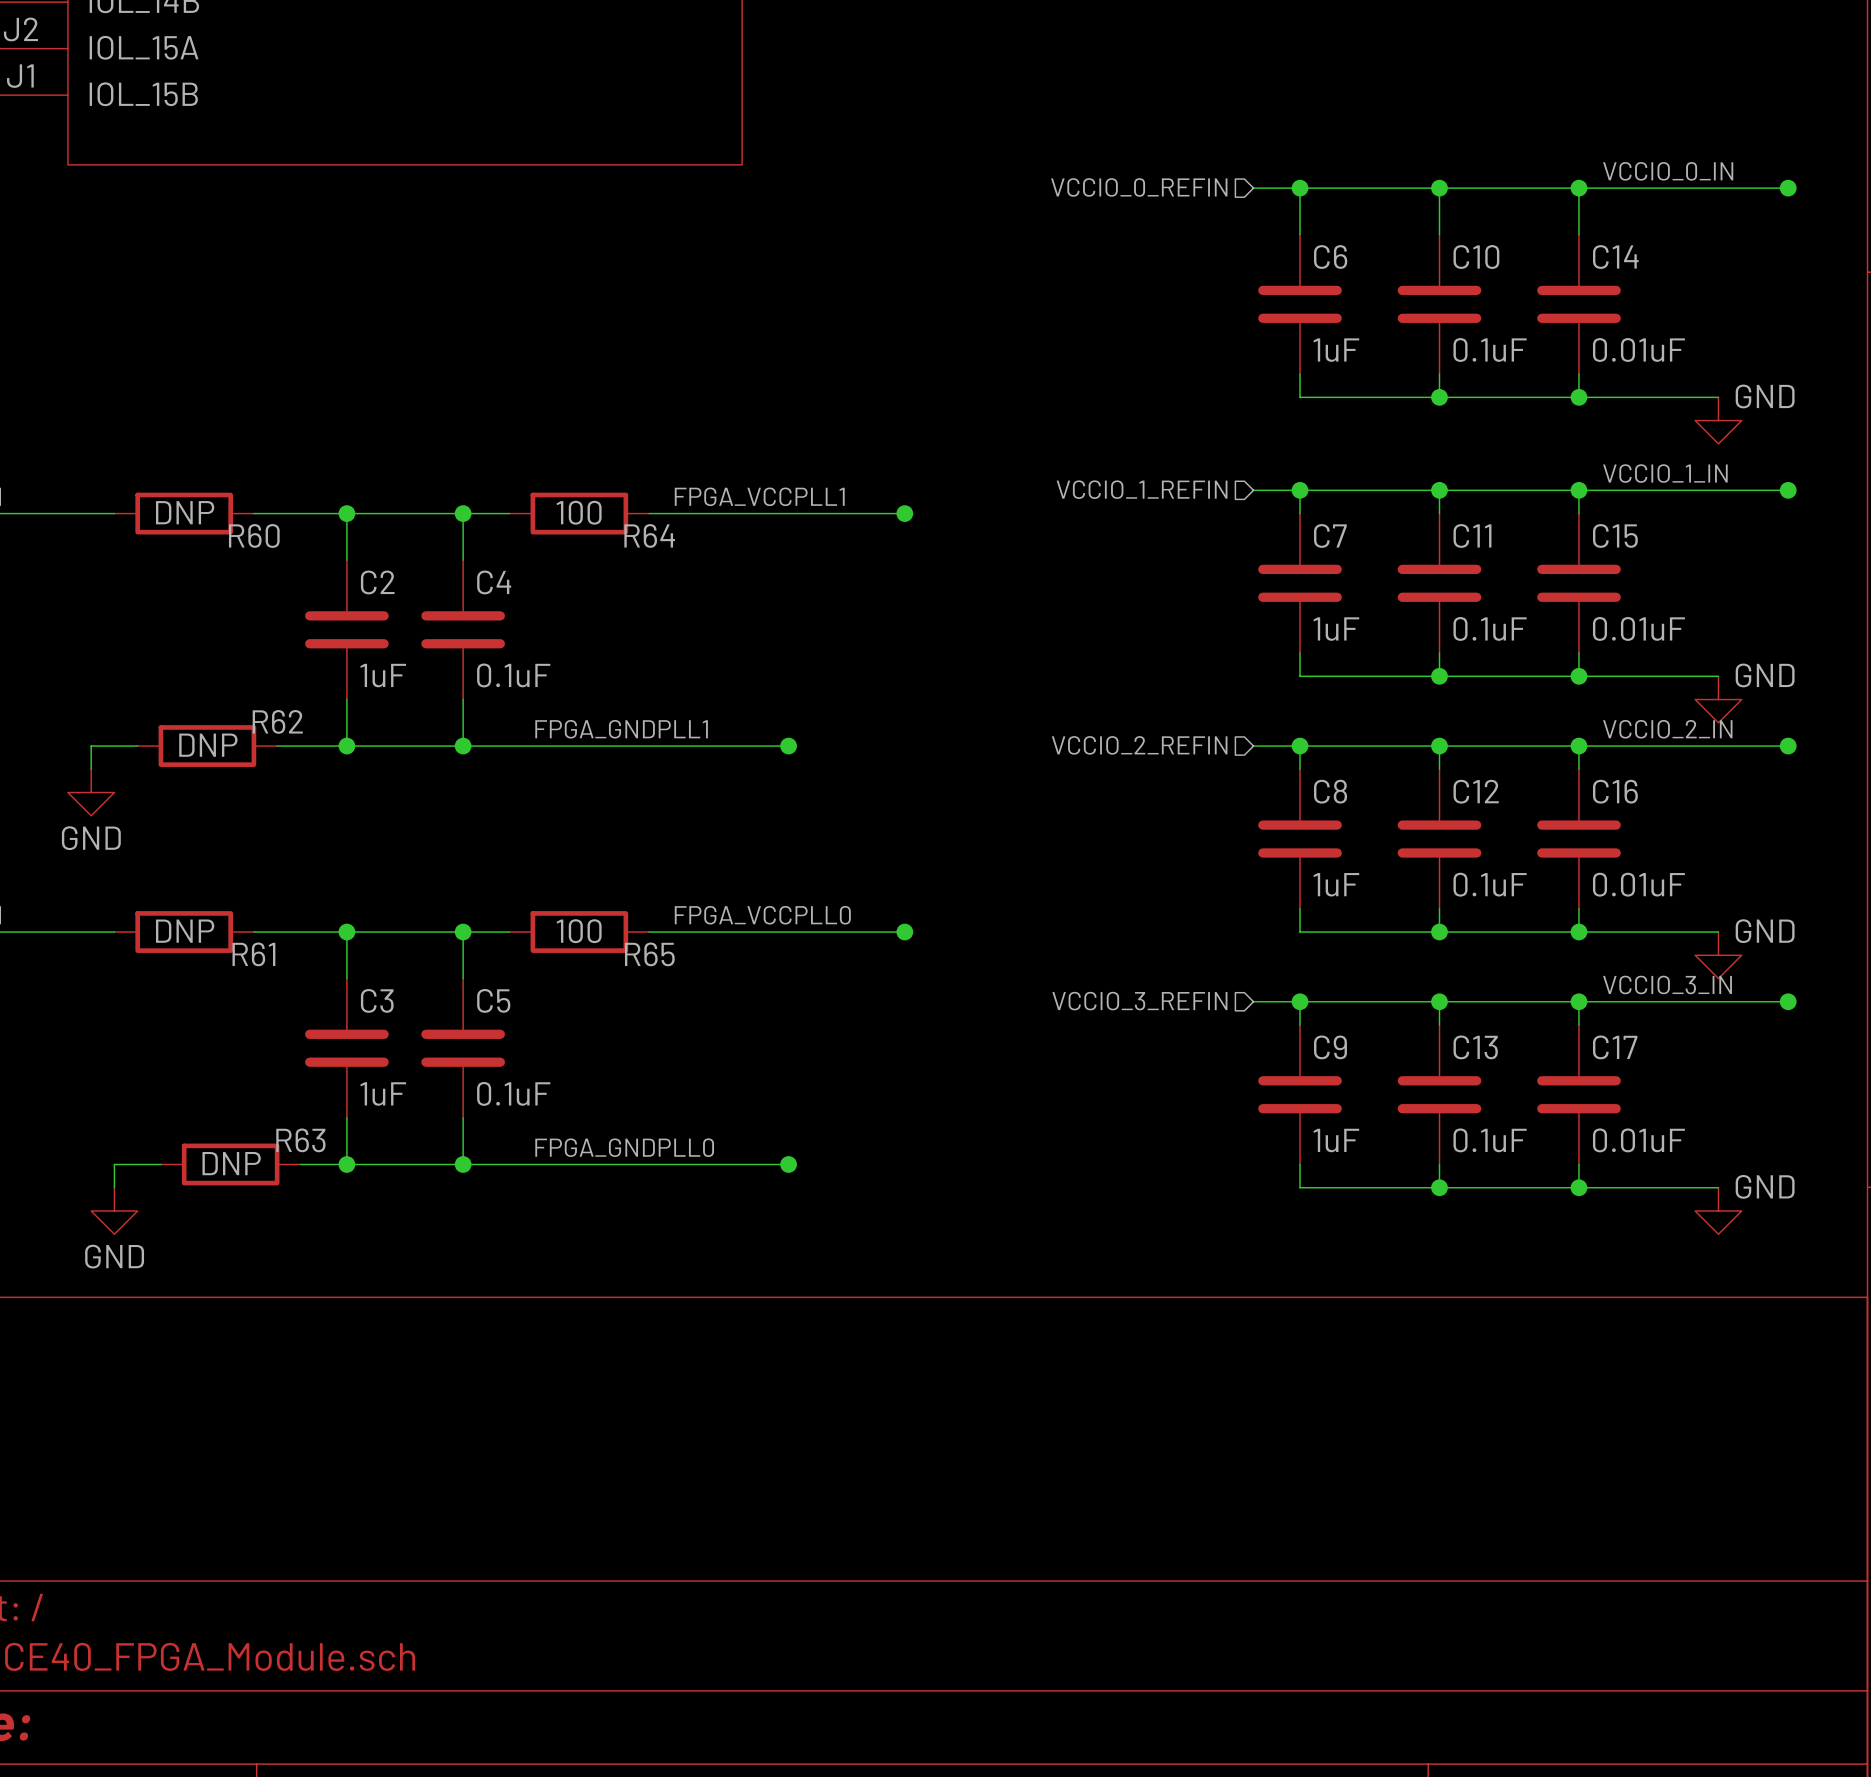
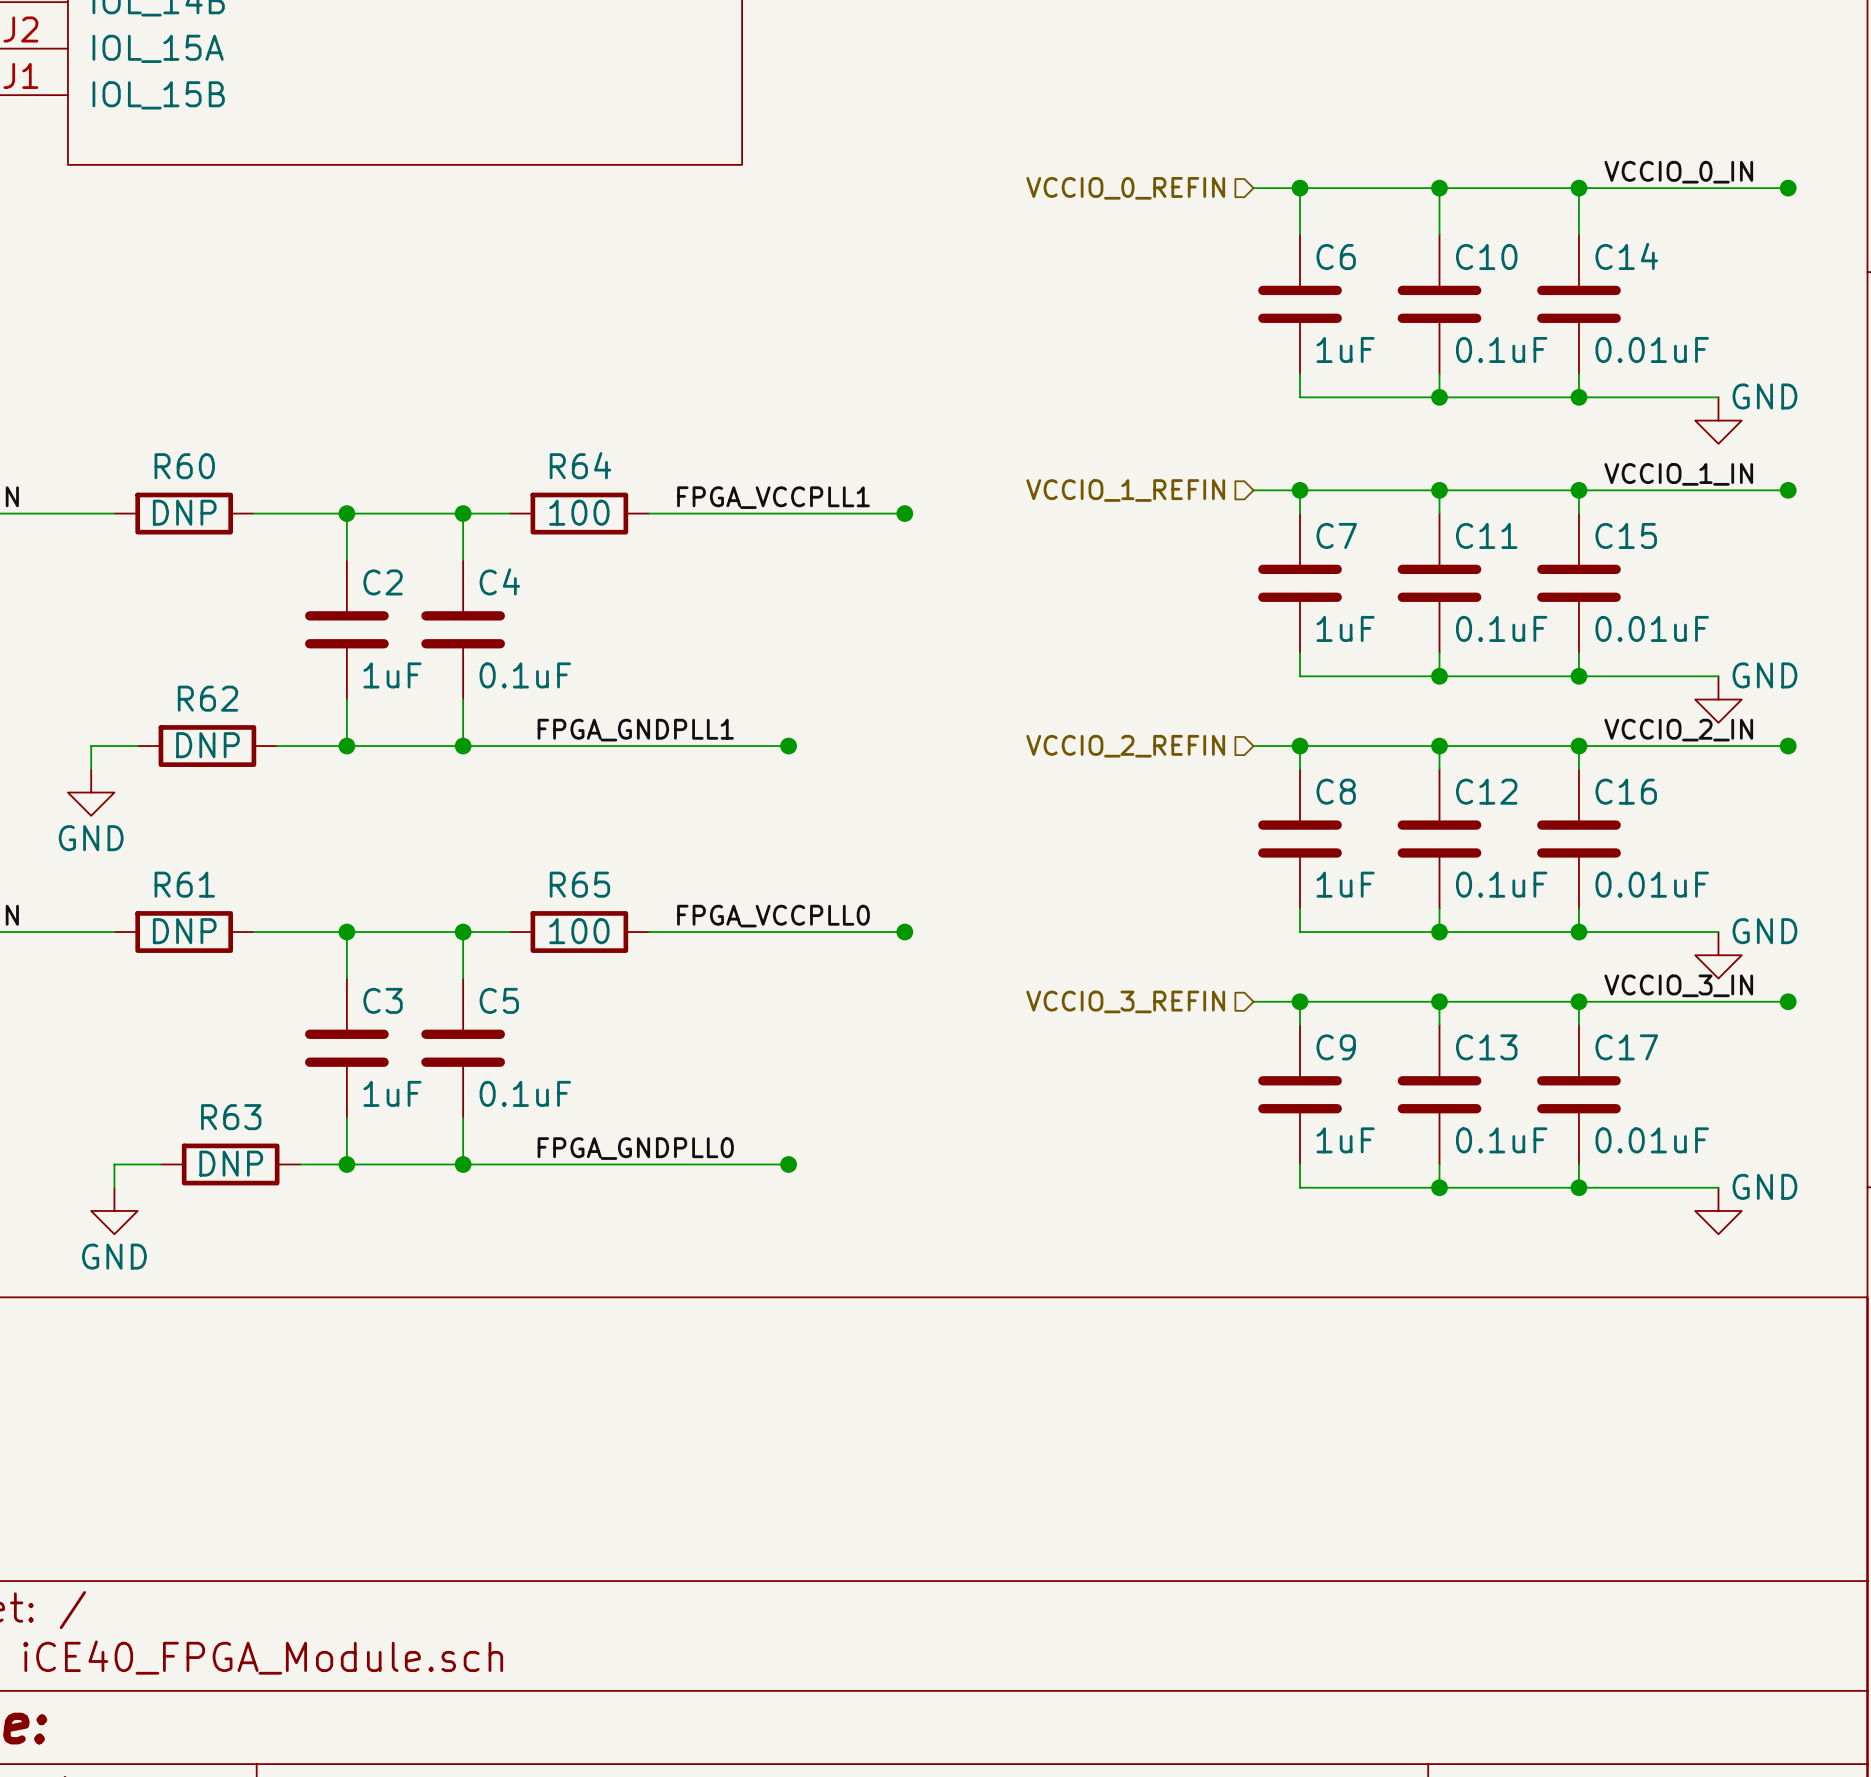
R60 name position: R60 (254, 535) -> R60 (184, 466)
R64 name position: R64 (649, 535) -> R64 (580, 465)
R62 name position: R62 (277, 721) -> R62 (207, 698)
R61 name position: R61 (253, 954) -> R61 (184, 884)
R65 name position: R65 (649, 954) -> R65 (579, 884)
R63 name position: R63 (300, 1140) -> R63 (231, 1117)

